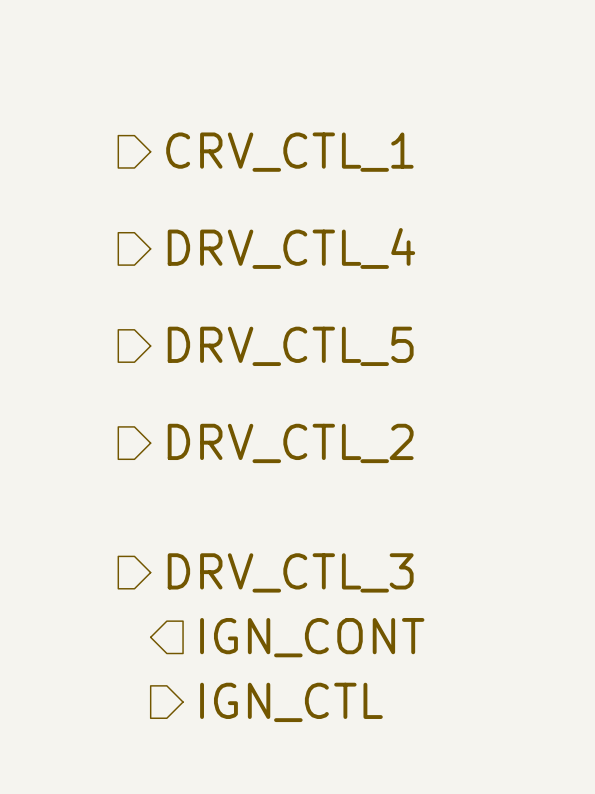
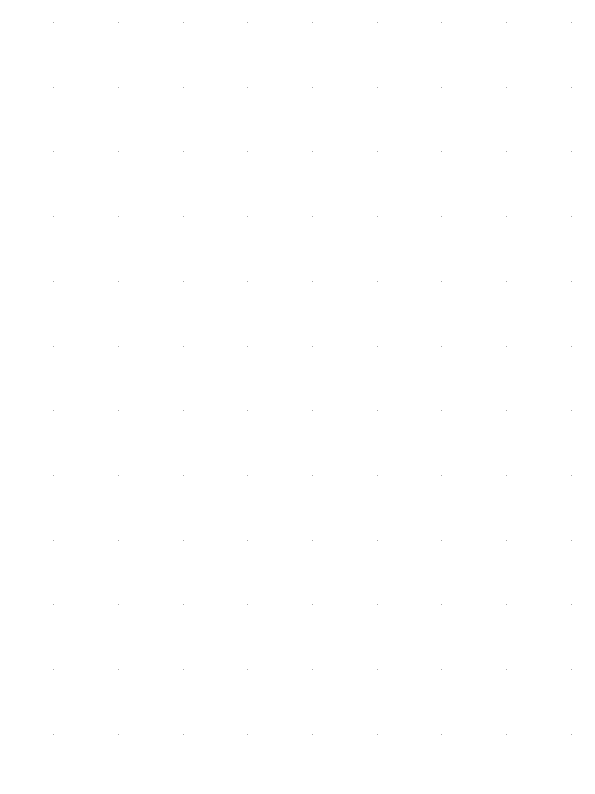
hierarchical label: CRV_CTL_1 (289, 152) -> none
hierarchical label: DRV_CTL_4 (291, 248) -> none
hierarchical label: DRV_CTL_5 (290, 346) -> none
hierarchical label: DRV_CTL_2 (290, 443) -> none
hierarchical label: DRV_CTL_3 (290, 572) -> none
hierarchical label: IGN_CONT (312, 637) -> none
hierarchical label: IGN_CTL (291, 702) -> none

